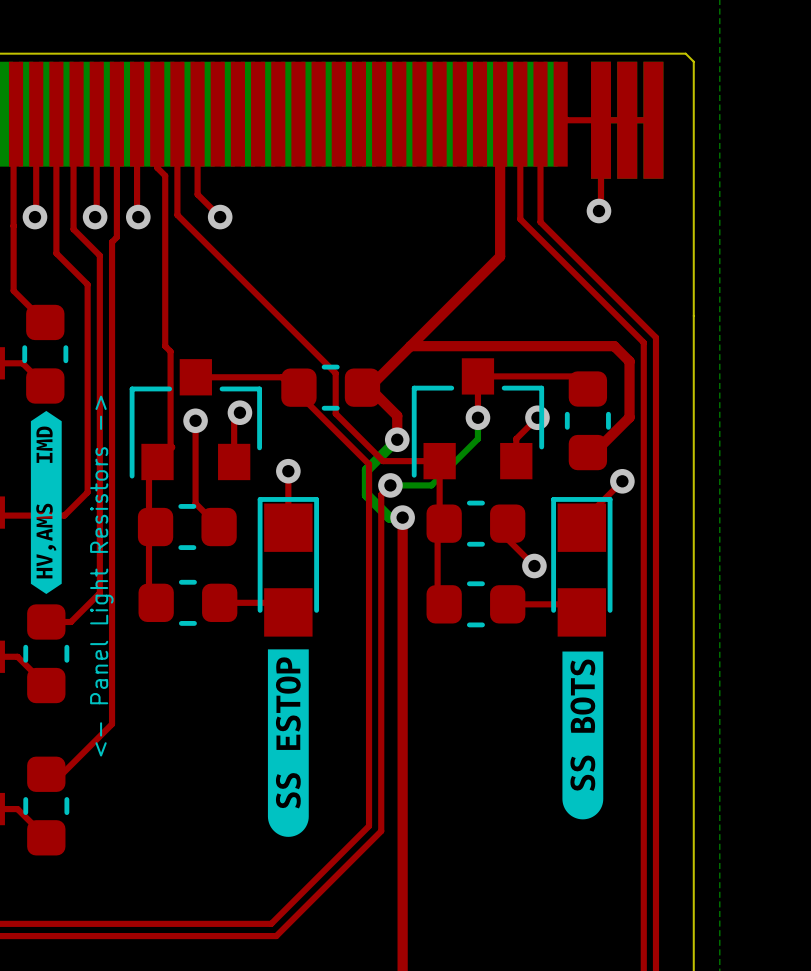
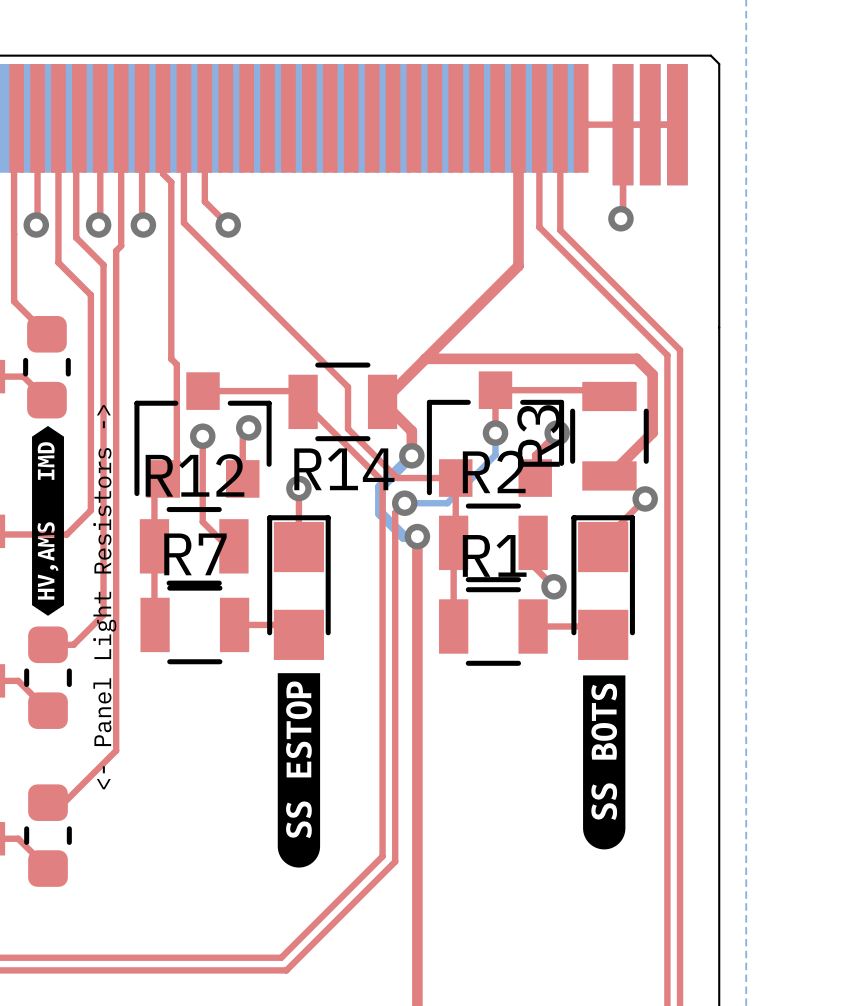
part: (330, 387) -> none
R14: none -> (342, 401)
part: (587, 420) -> none
R3: none -> (609, 436)
part: (475, 523) -> none
R2: none -> (493, 542)
part: (187, 527) -> none
R12: none -> (194, 546)
part: (187, 602) -> none
R7: none -> (194, 624)
part: (475, 604) -> none
R1: none -> (493, 626)

